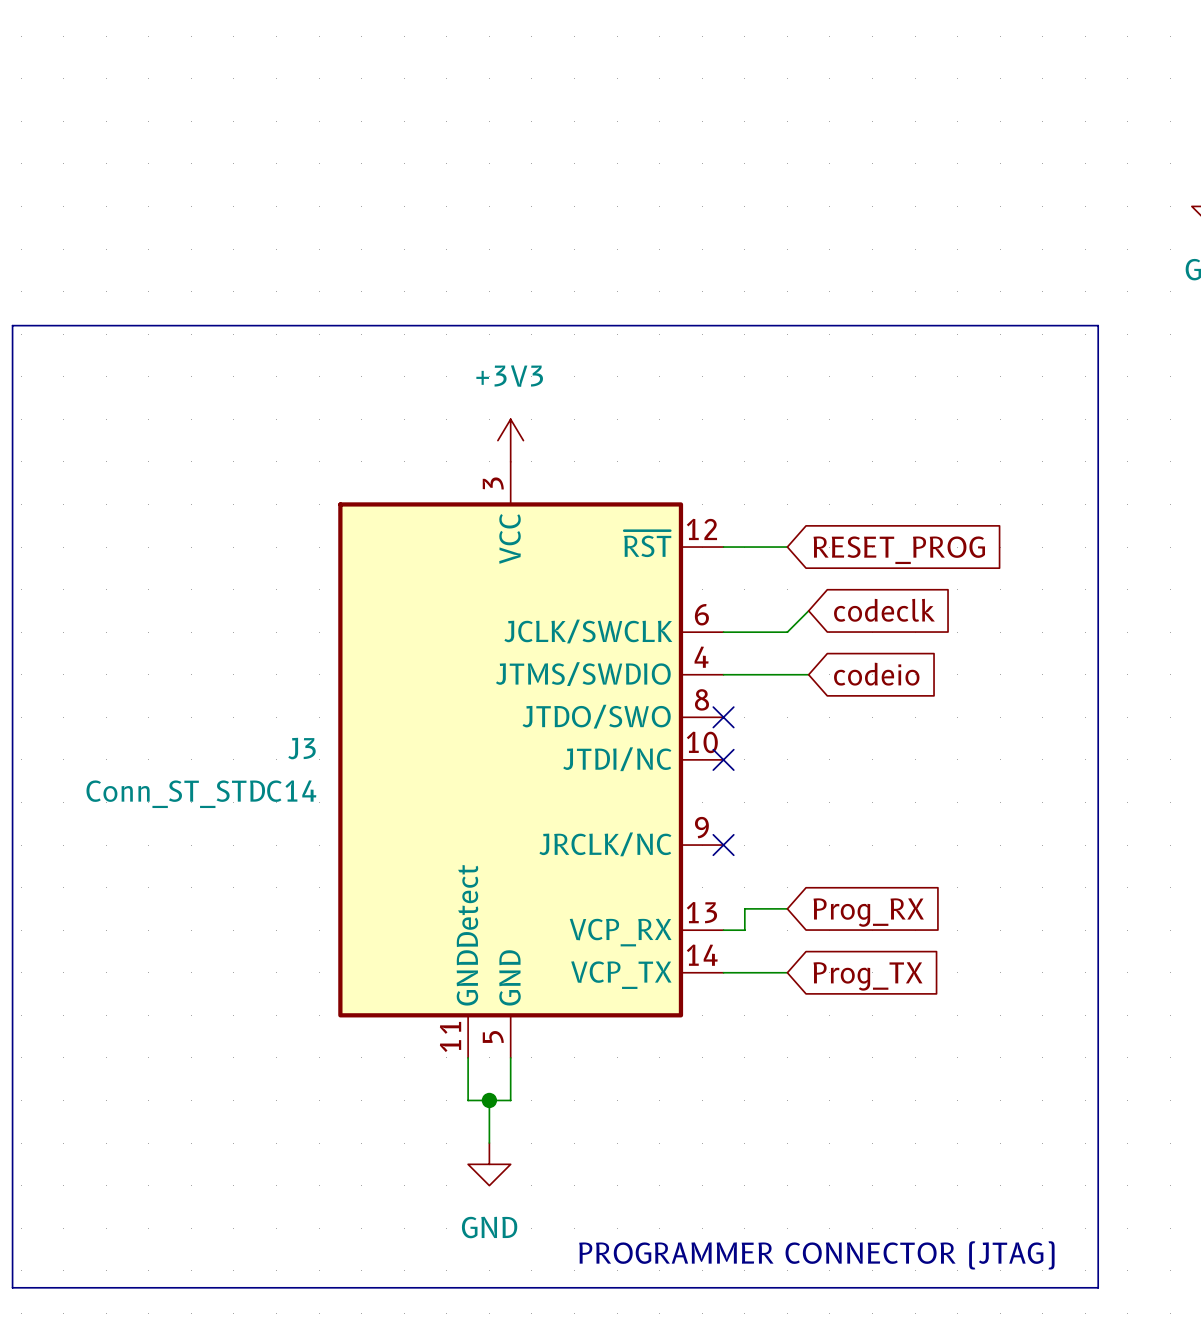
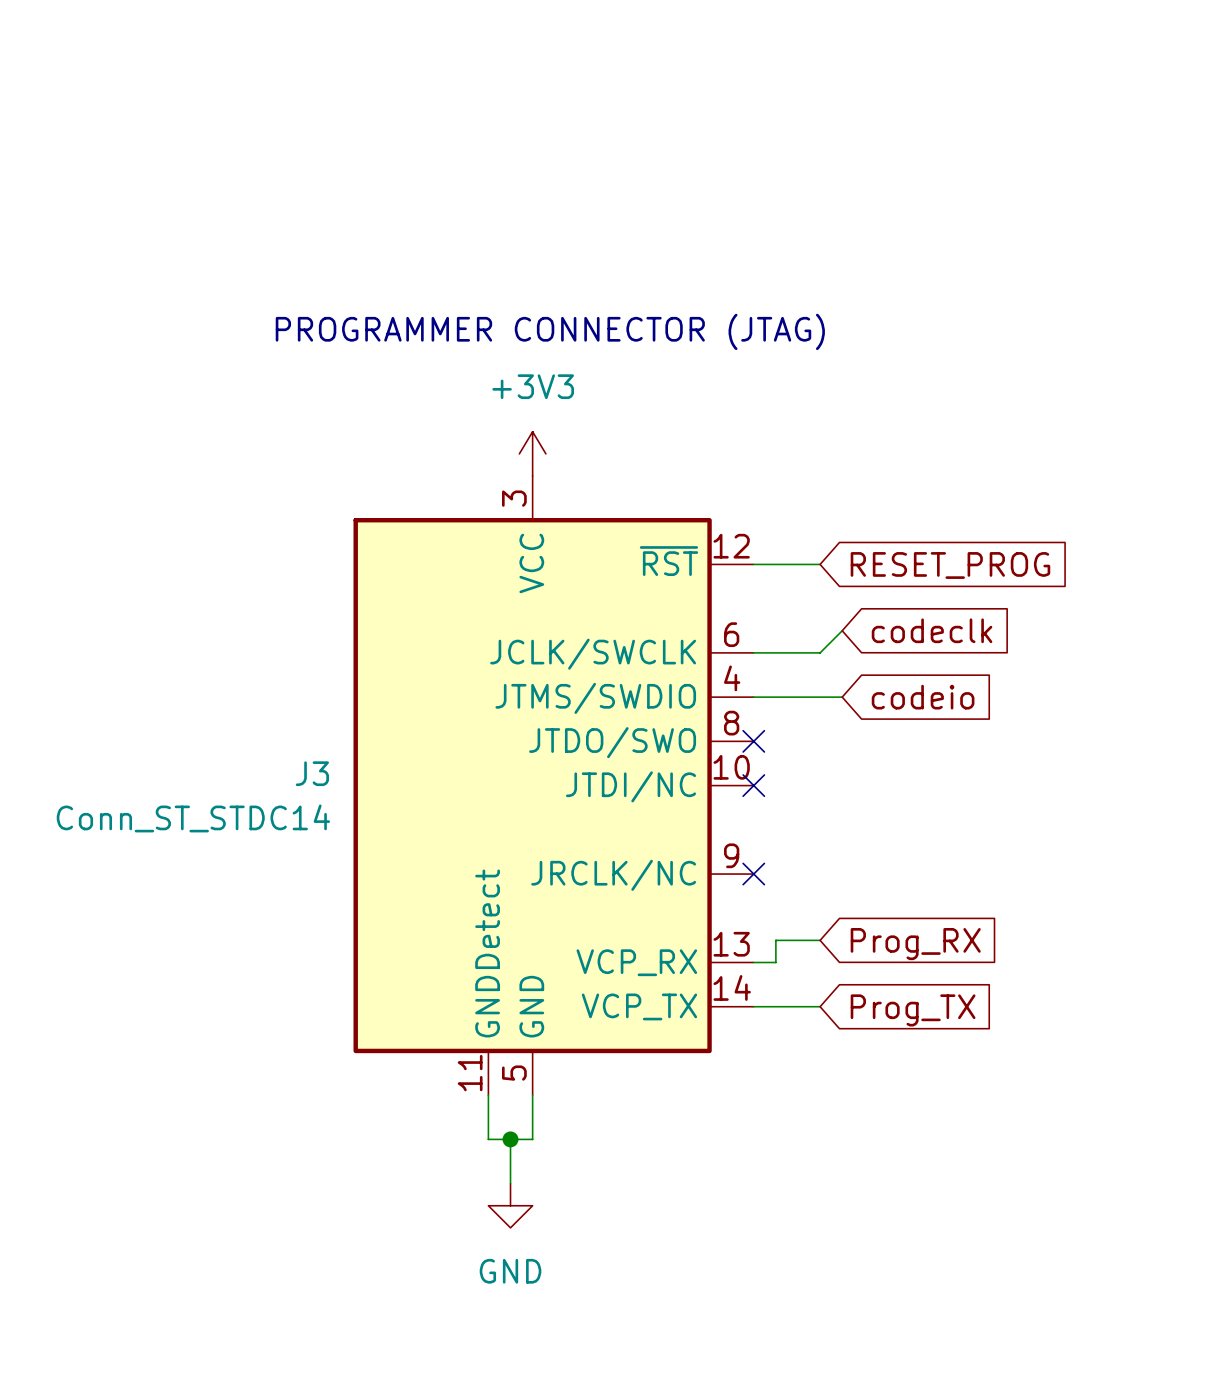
text: none -> PROGRAMMER CONNECTOR (JTAG) (550, 331)
line: (12, 325) (1098, 325) (1098, 1287) (12, 1287) (12, 325) -> none
text: PROGRAMMER CONNECTOR (JTAG) (816, 1255) -> none

